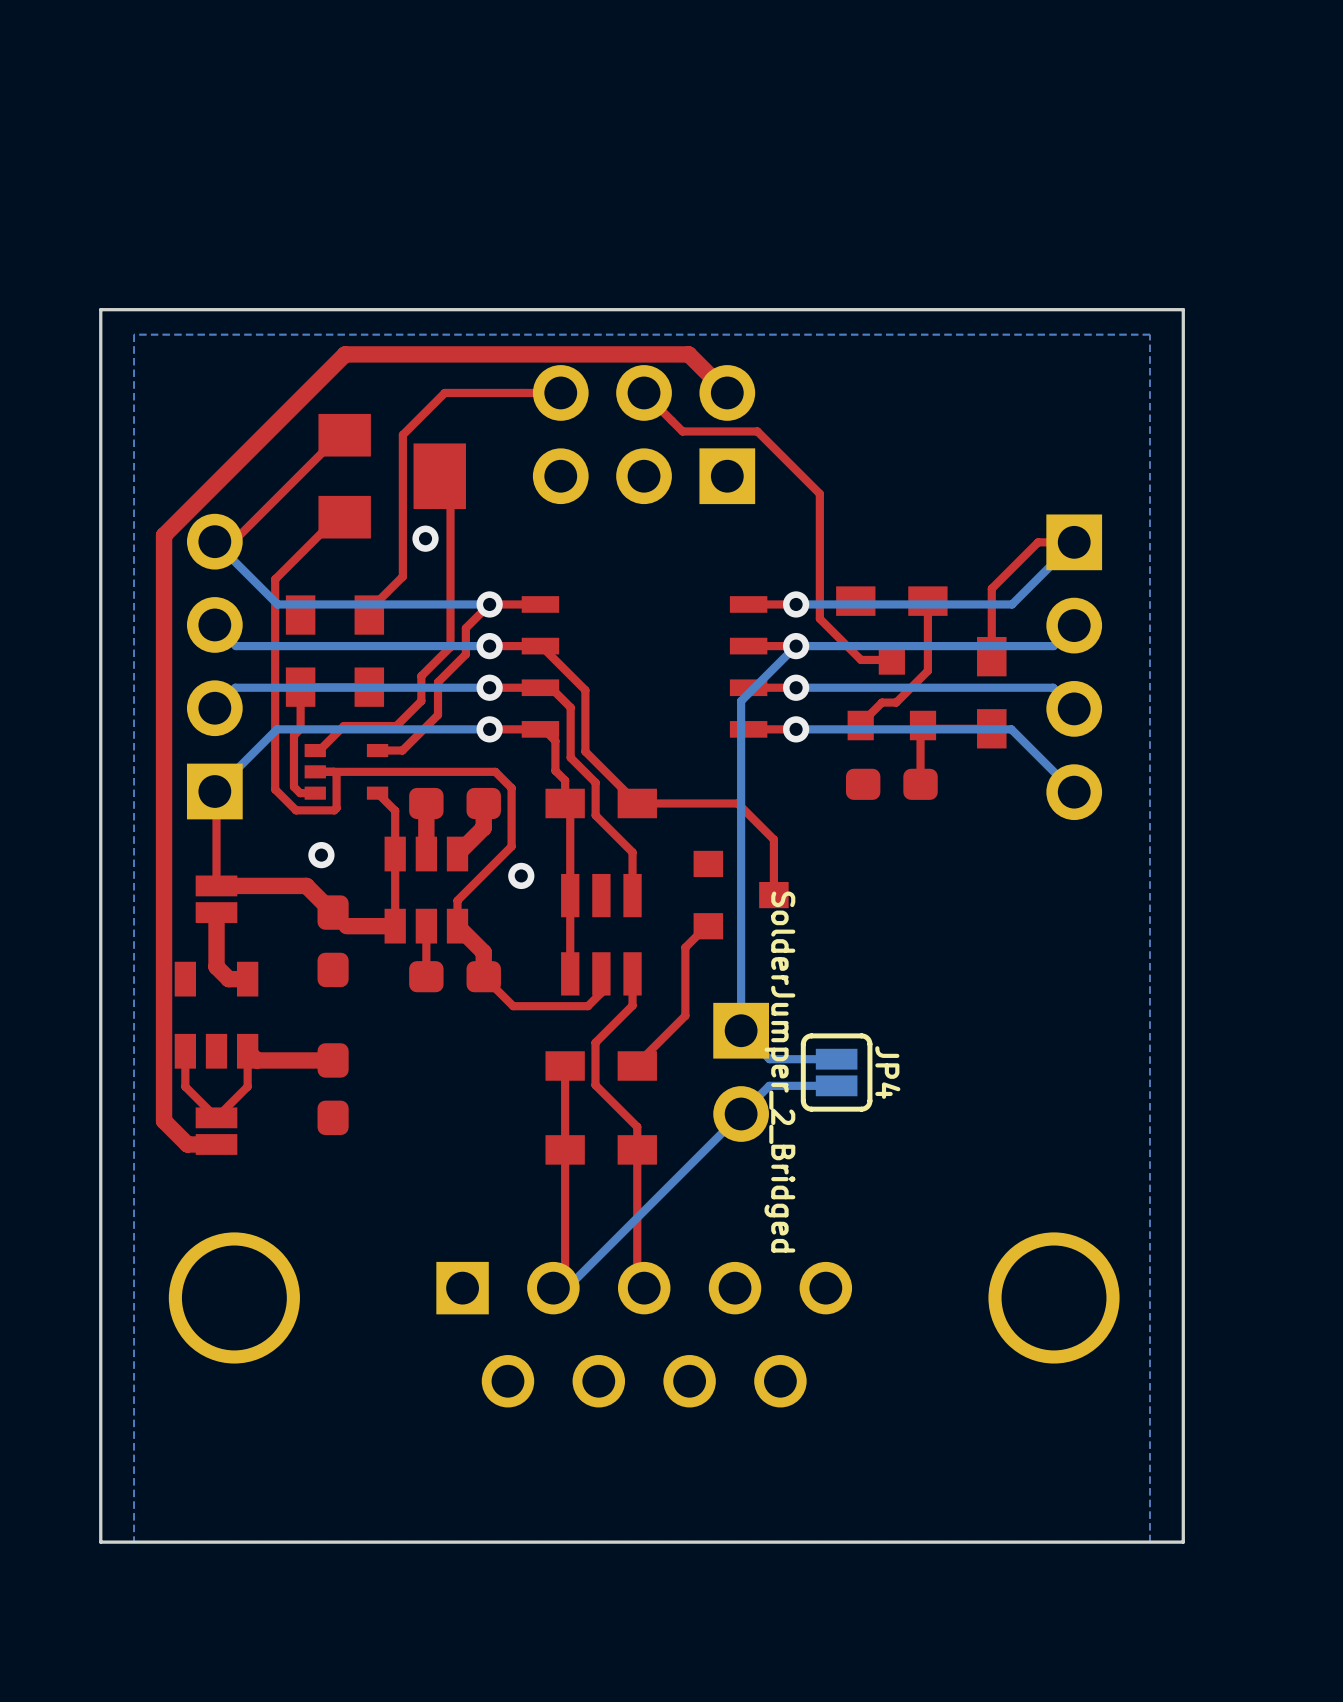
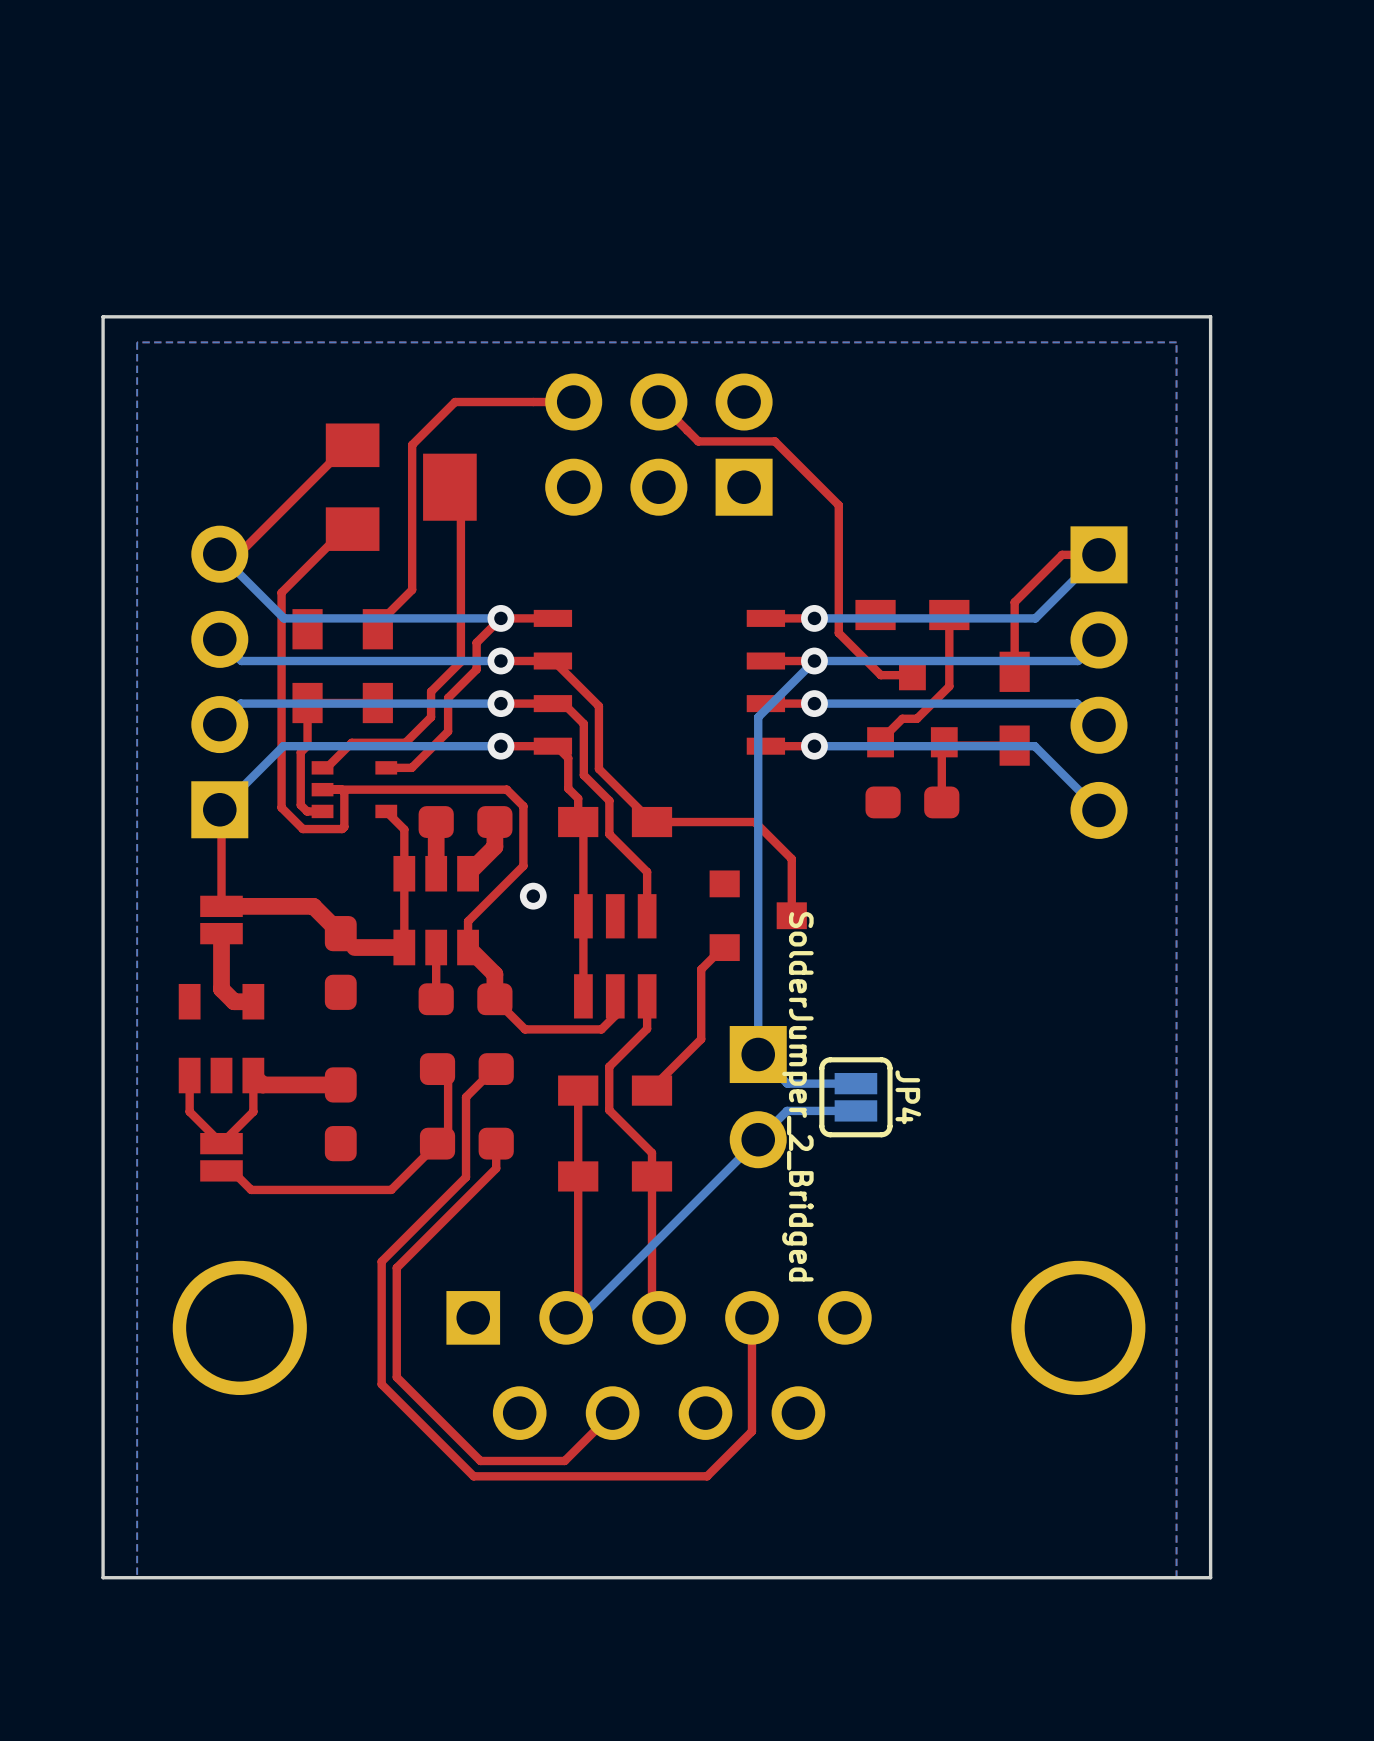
top track: (727, 392) (688, 354) (345, 354) (164, 535) (164, 1121) (187, 1144) (216, 1144) -> (437, 1069) (448, 1079) (448, 1133) (391, 1189) (251, 1189) (232, 1170) (221, 1170)
via: (425, 538) -> none
via: (321, 855) -> none
part: none -> (466, 1069)
top track: none -> (496, 1069) (466, 1097) (466, 1177) (381, 1261) (381, 1384) (473, 1476) (707, 1476) (751, 1431) (751, 1317)
part: none -> (466, 1143)
top track: none -> (496, 1143) (496, 1168) (396, 1267) (396, 1377) (480, 1460) (564, 1460) (612, 1413)

